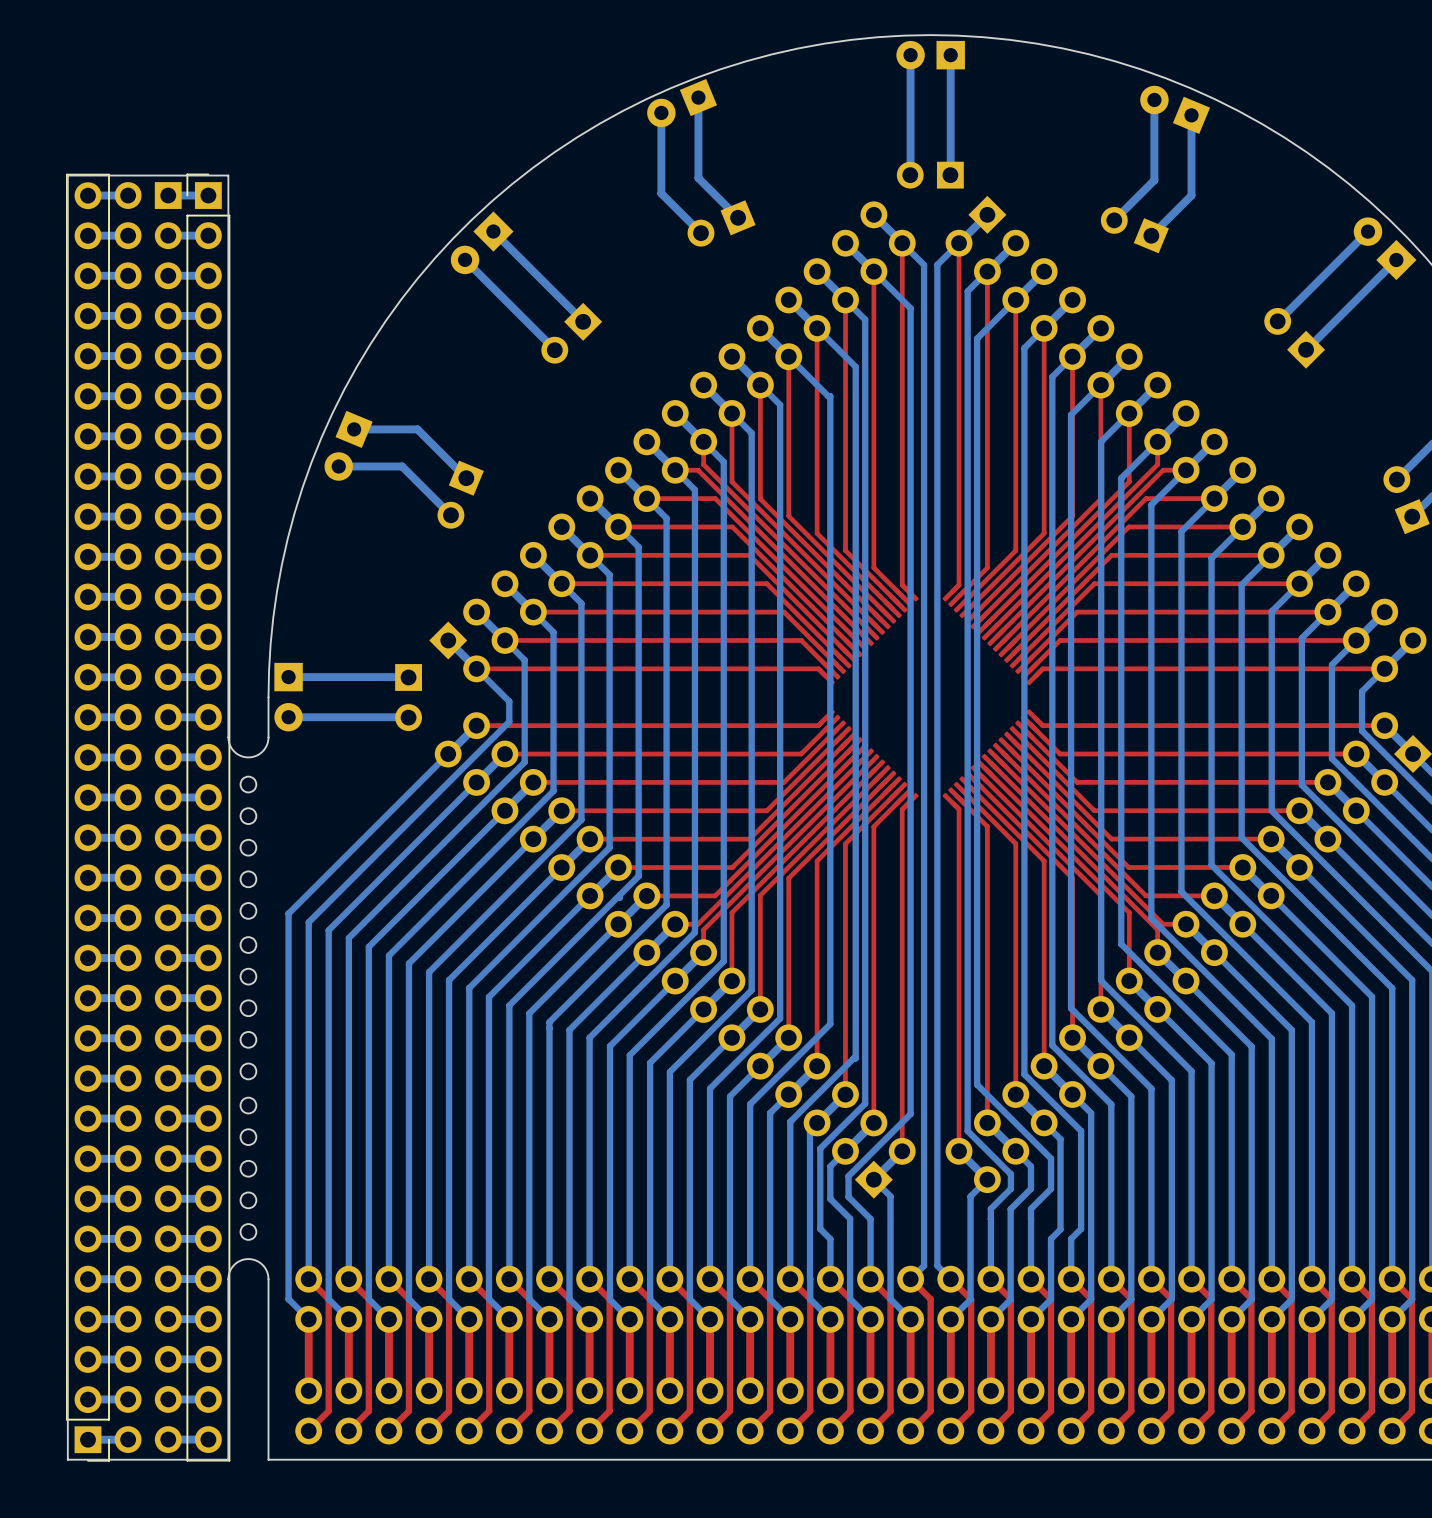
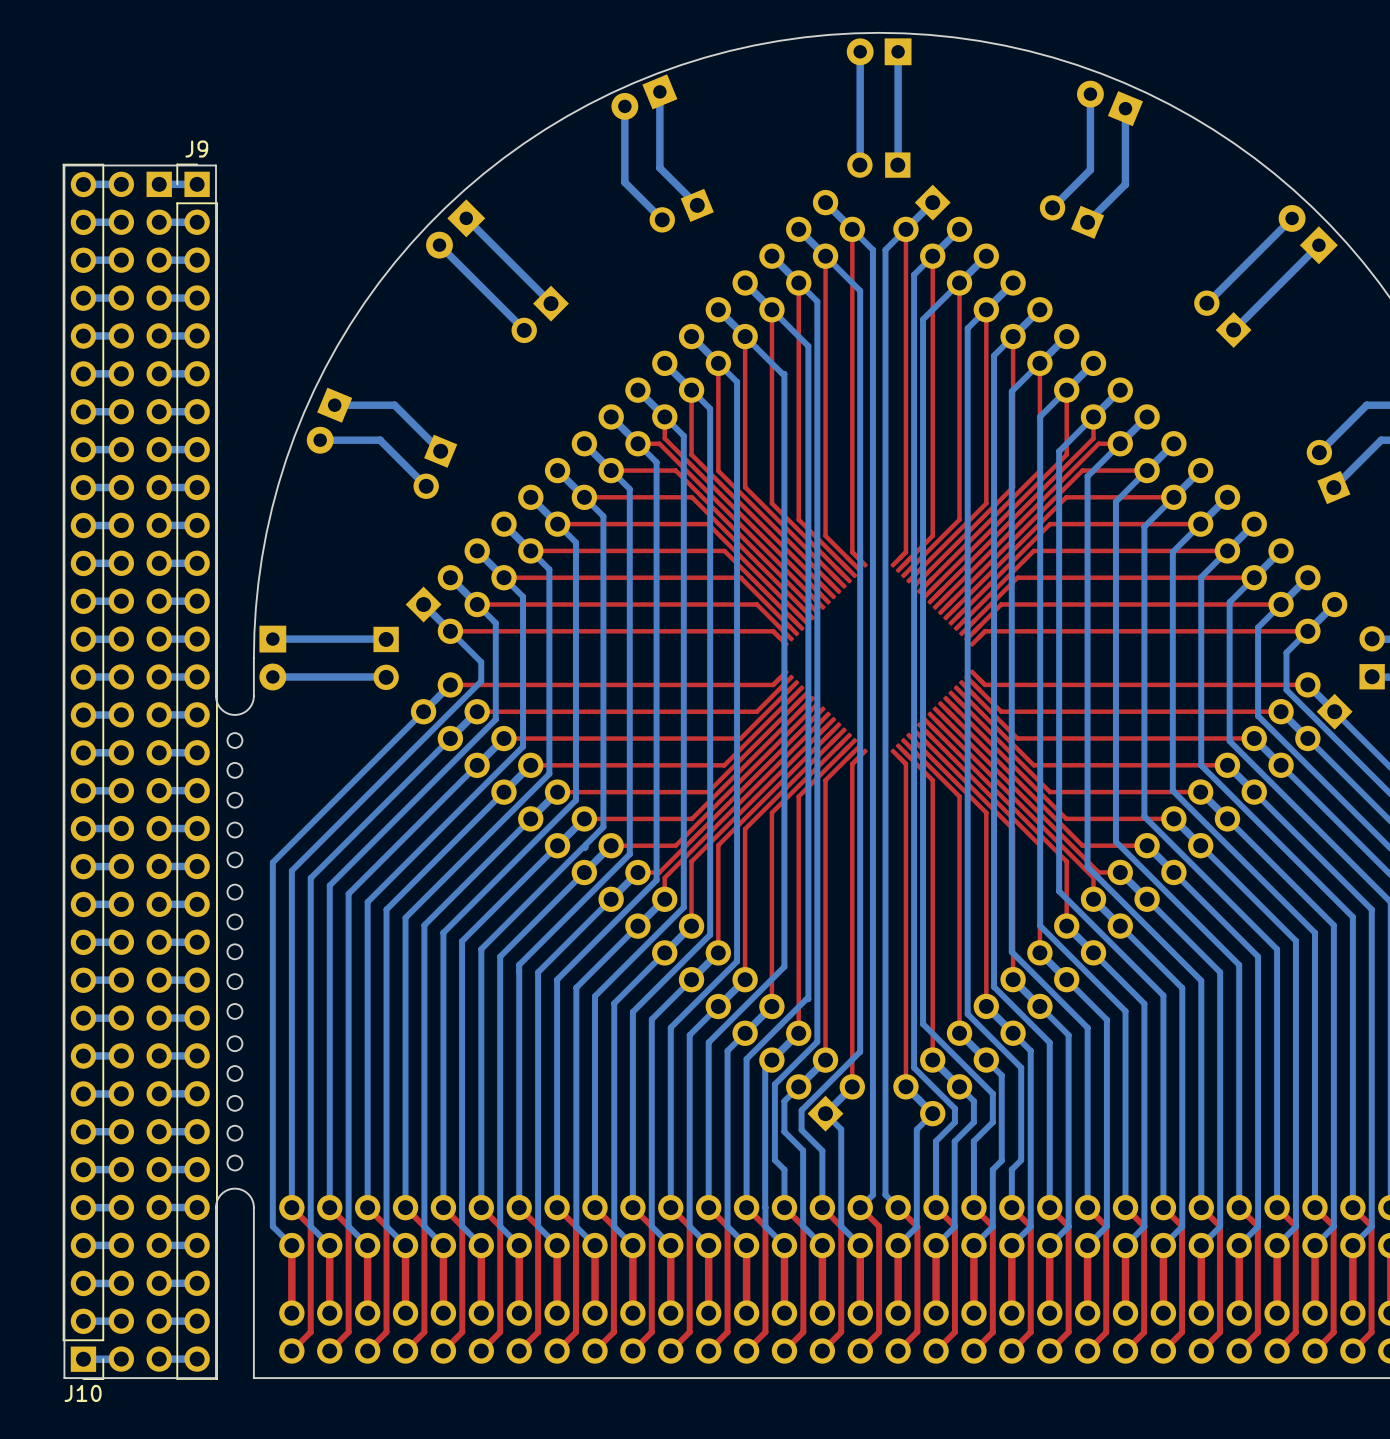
J9 name: none -> J9 (196, 149)
J10 name: none -> J10 (83, 1393)

